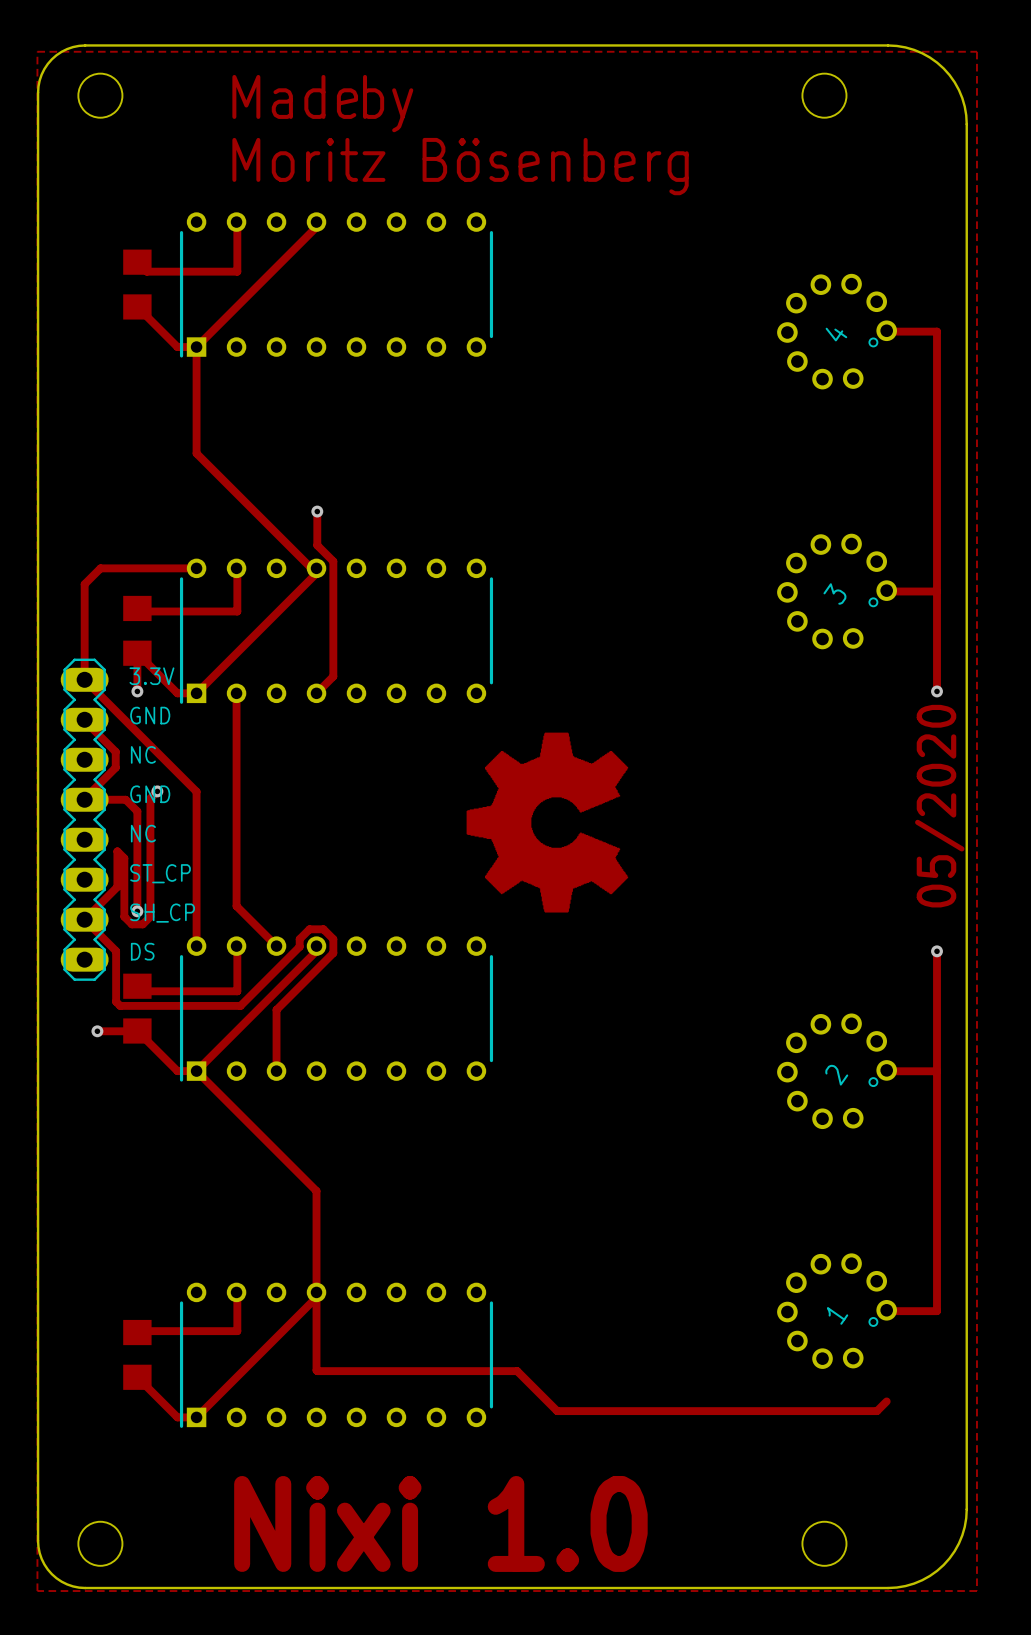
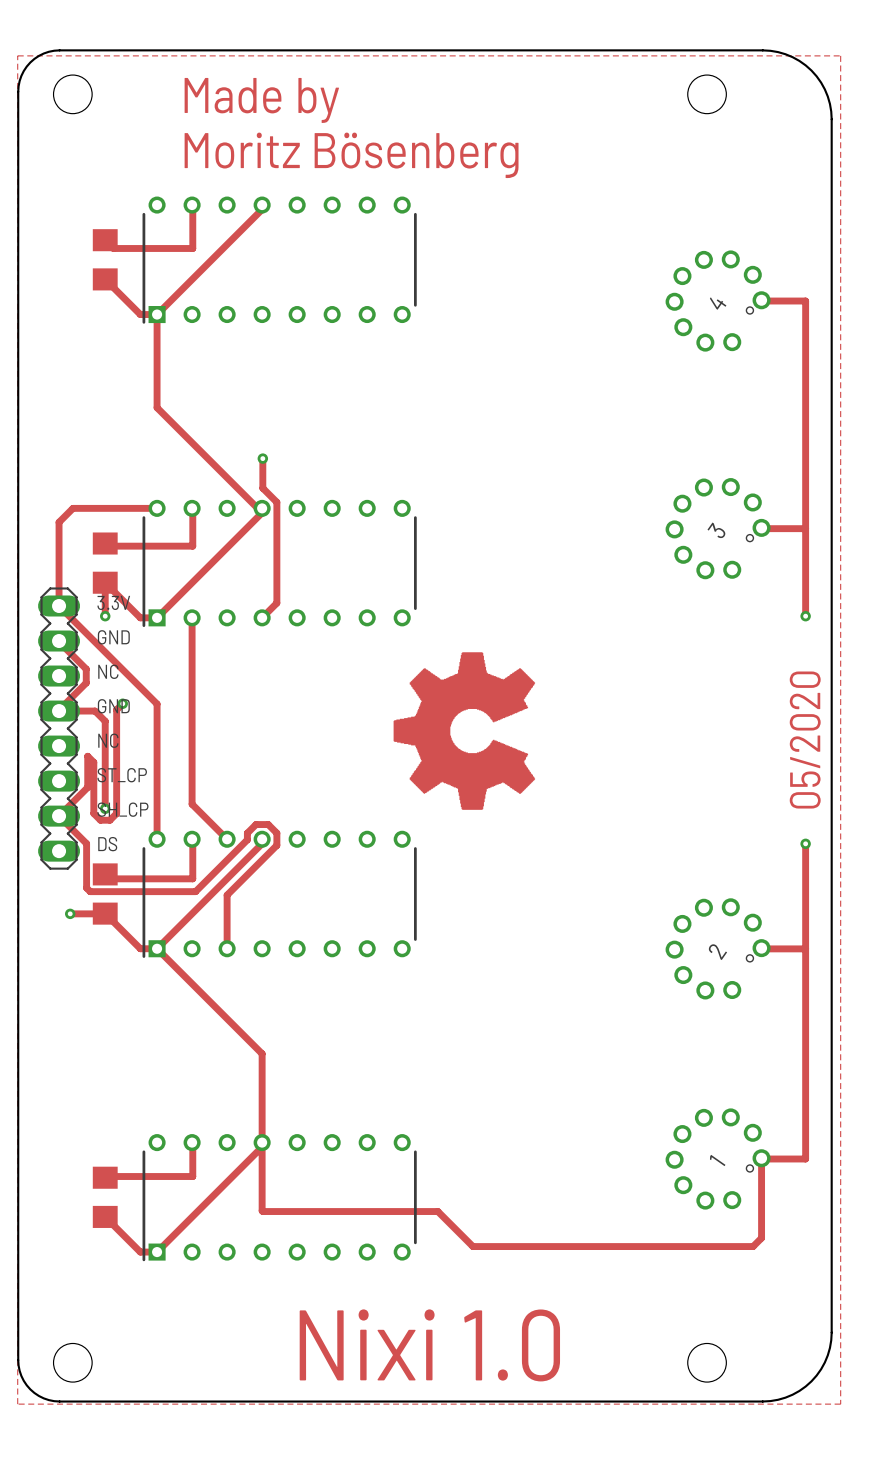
track: none -> (762, 1159) (761, 1238)

